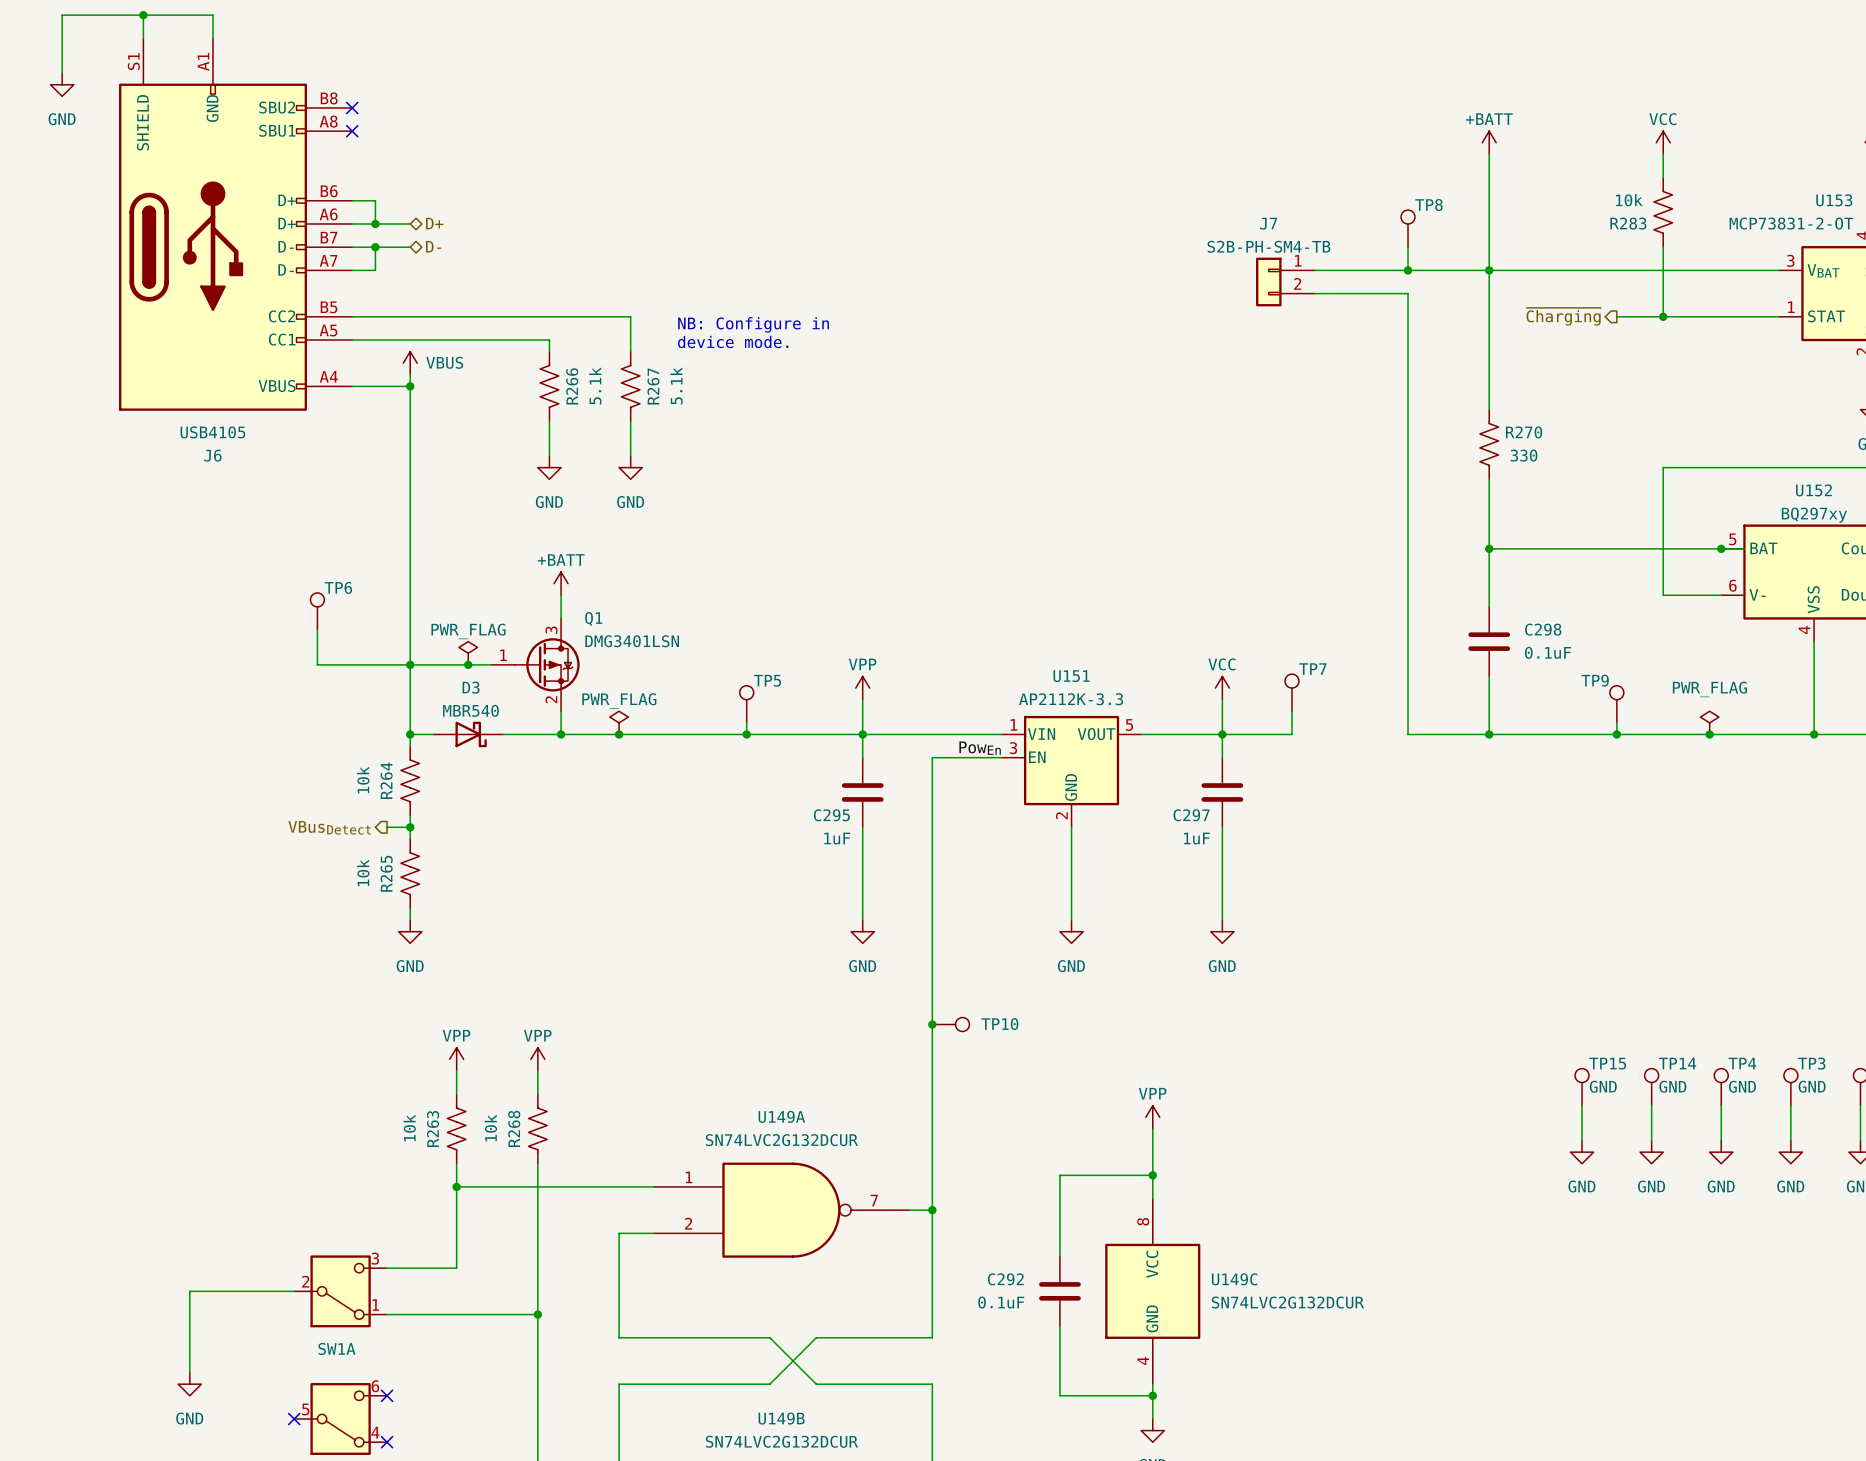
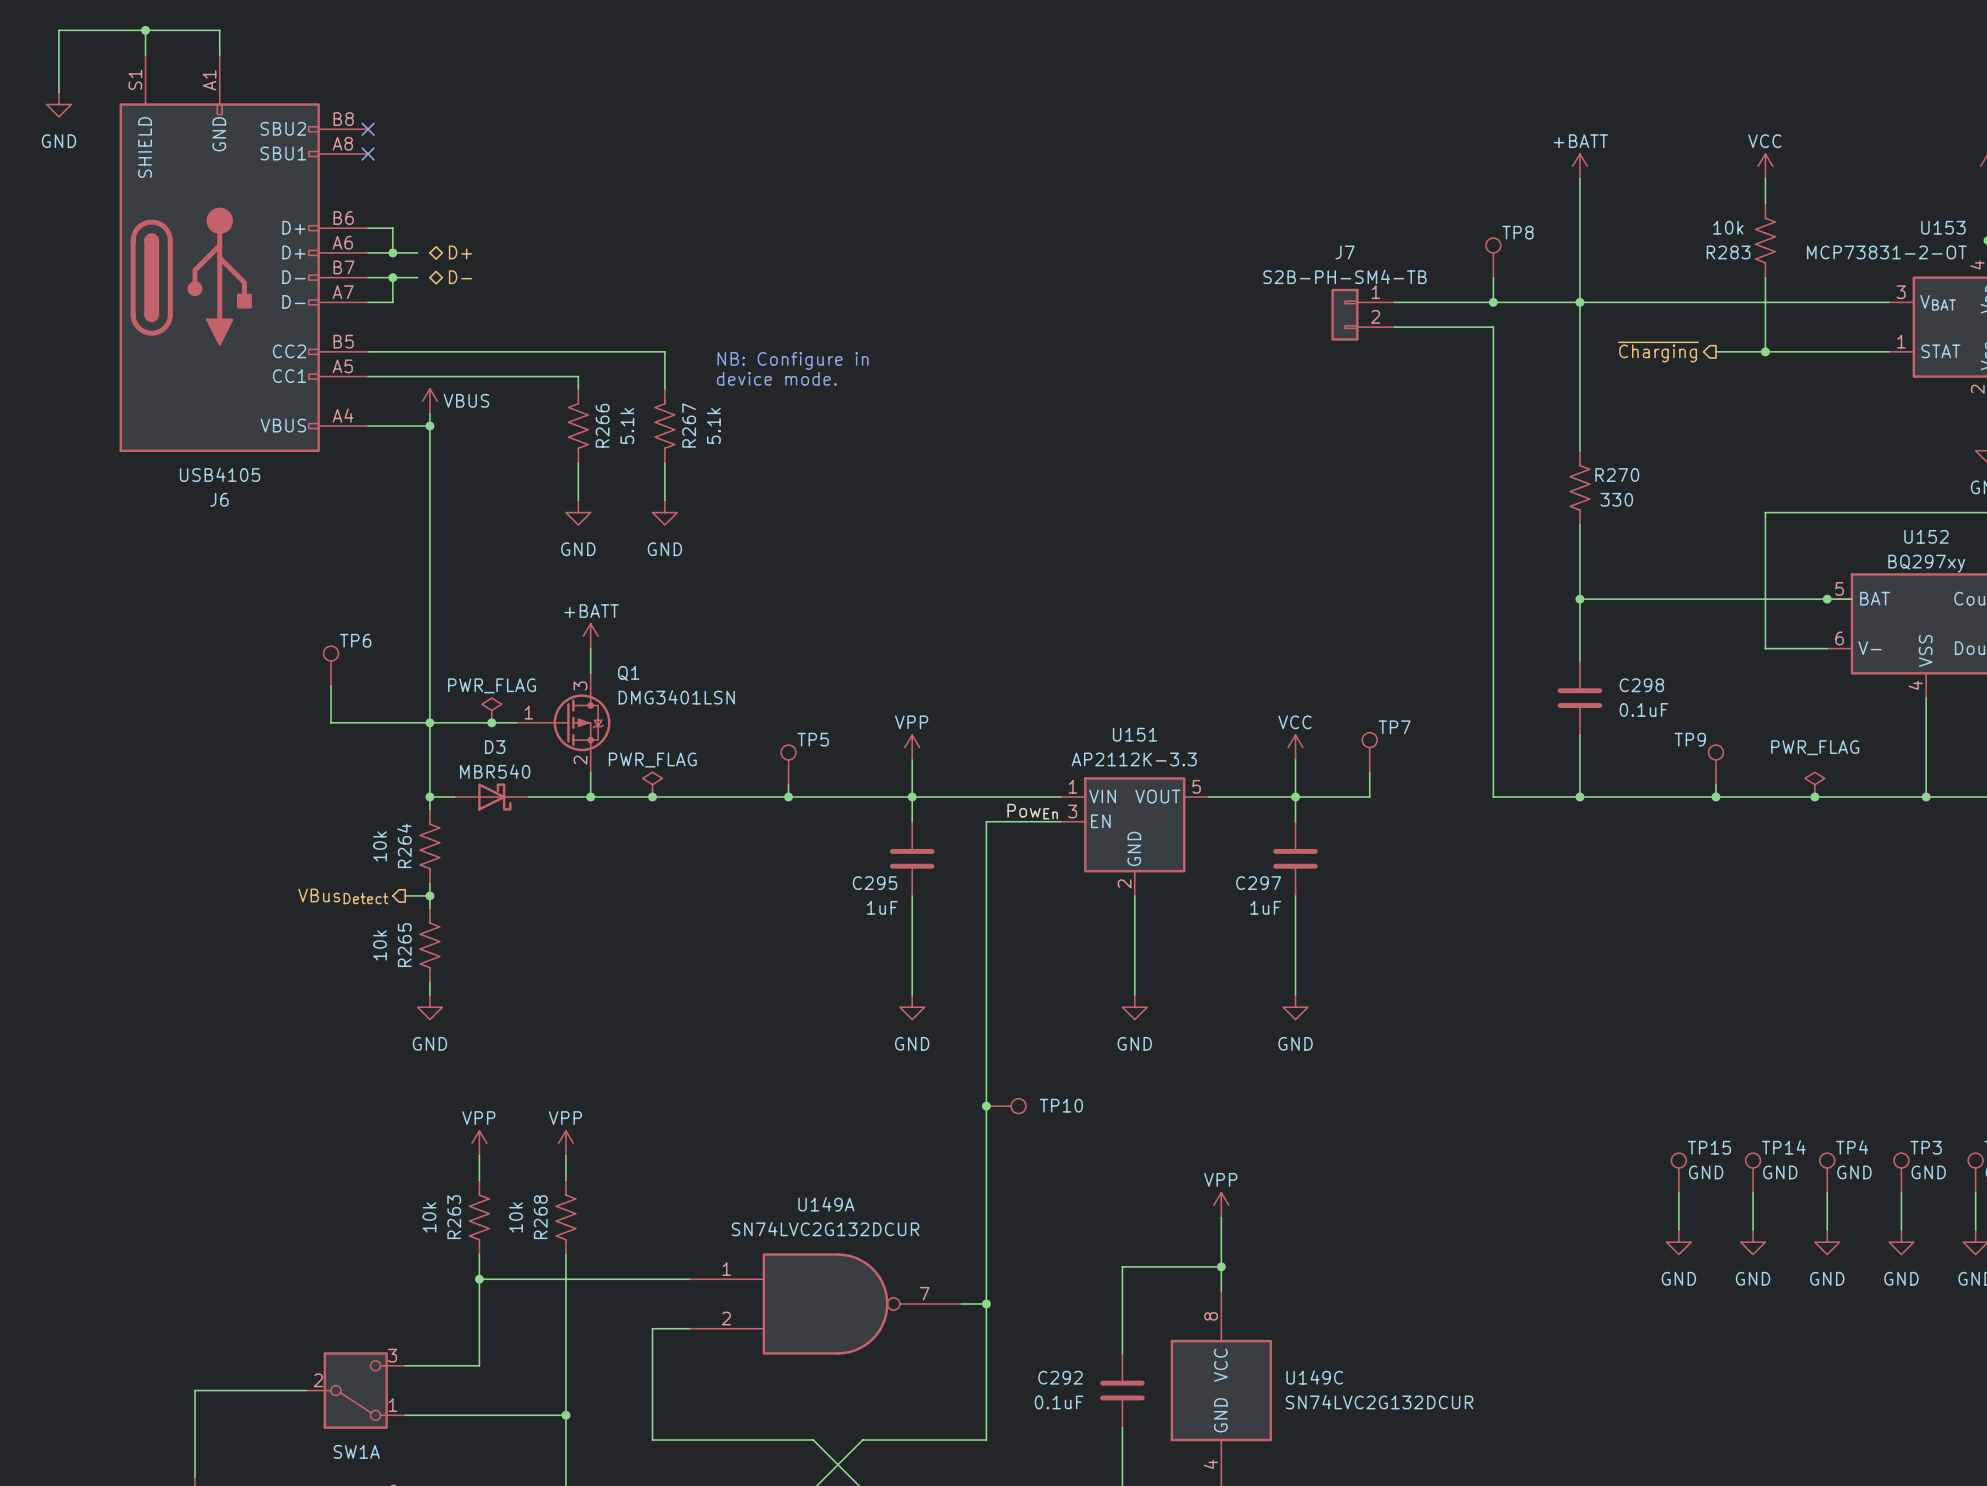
wire: (398, 223) (410, 223) -> none
wire: (398, 247) (410, 247) -> none

